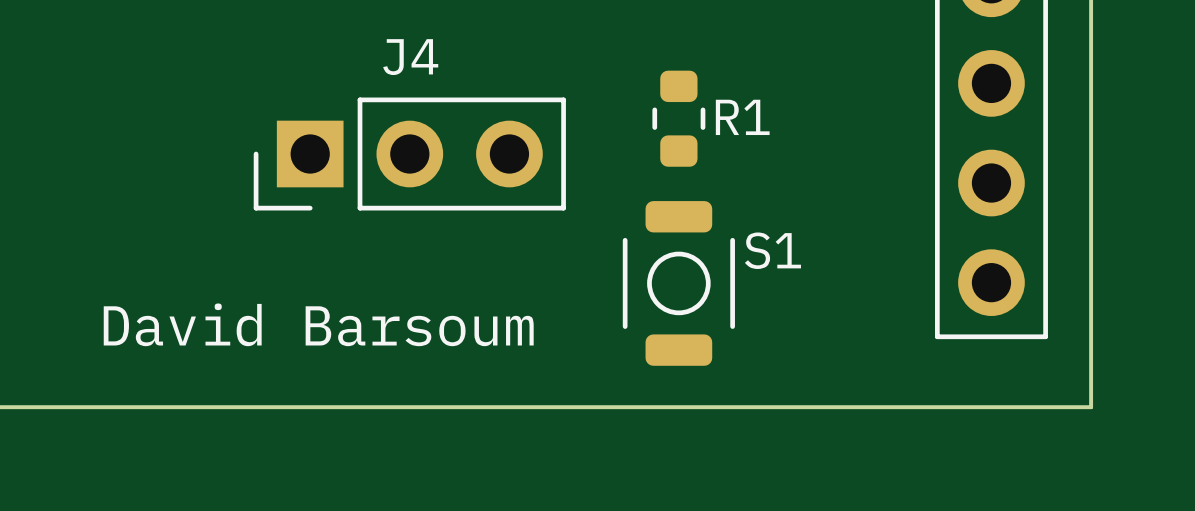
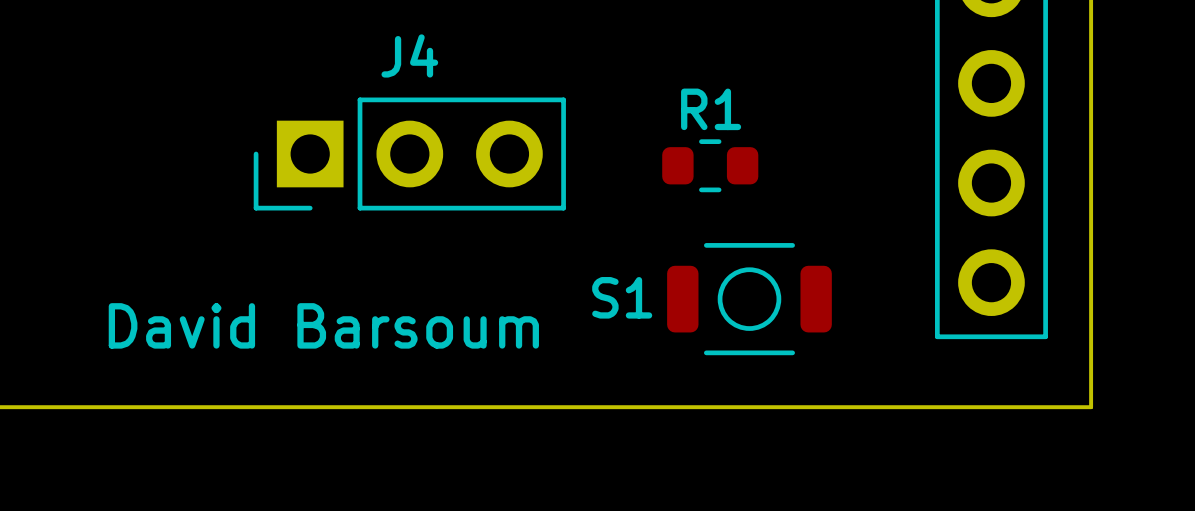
R1 name position: R1 (742, 117) -> R1 (711, 109)
R1 rotation: 0° (678, 118) -> 90° clockwise (710, 165)
S1 name position: S1 (772, 250) -> S1 (622, 297)
S1 rotation: 0° (678, 283) -> 90° clockwise (749, 299)

